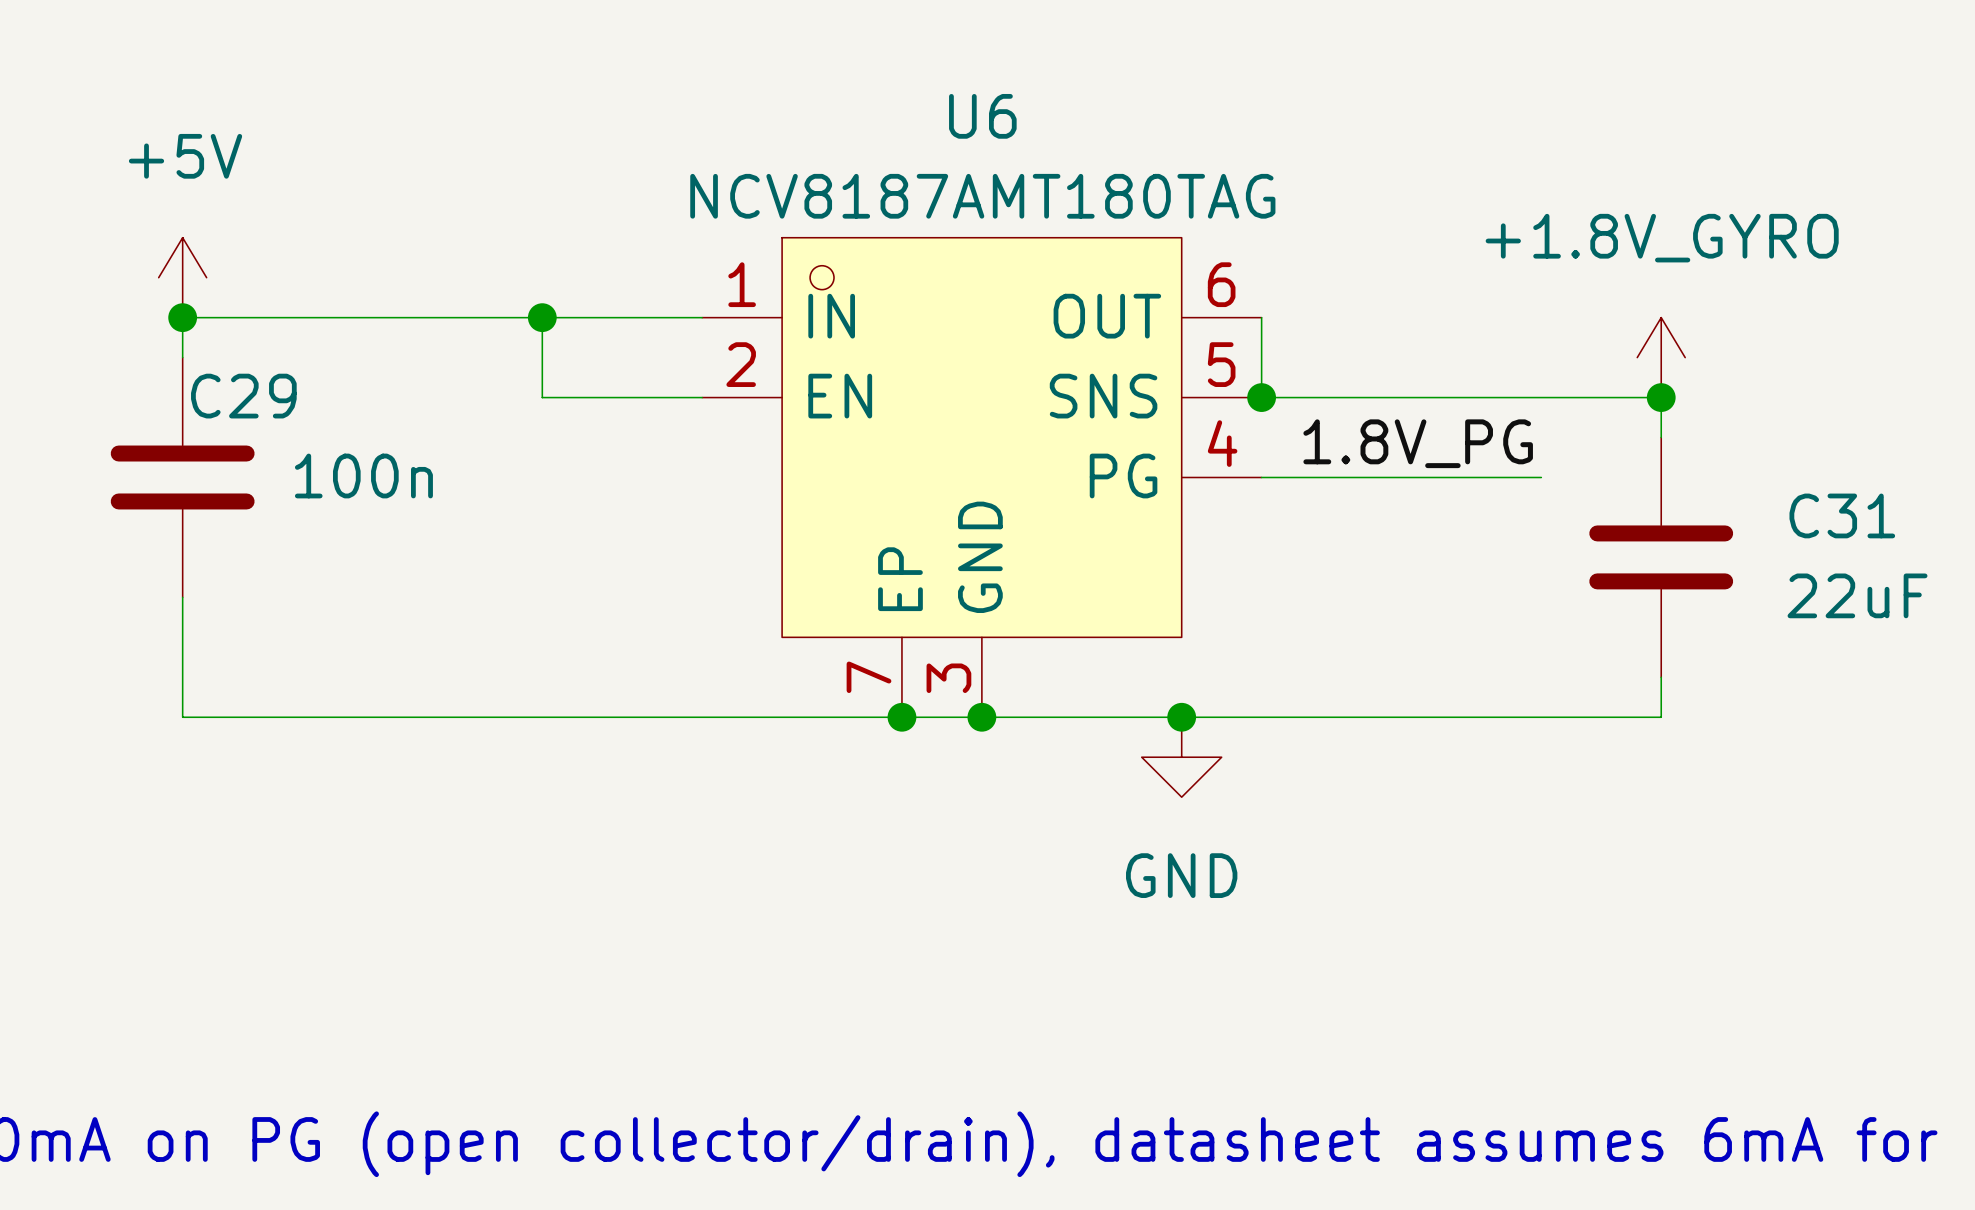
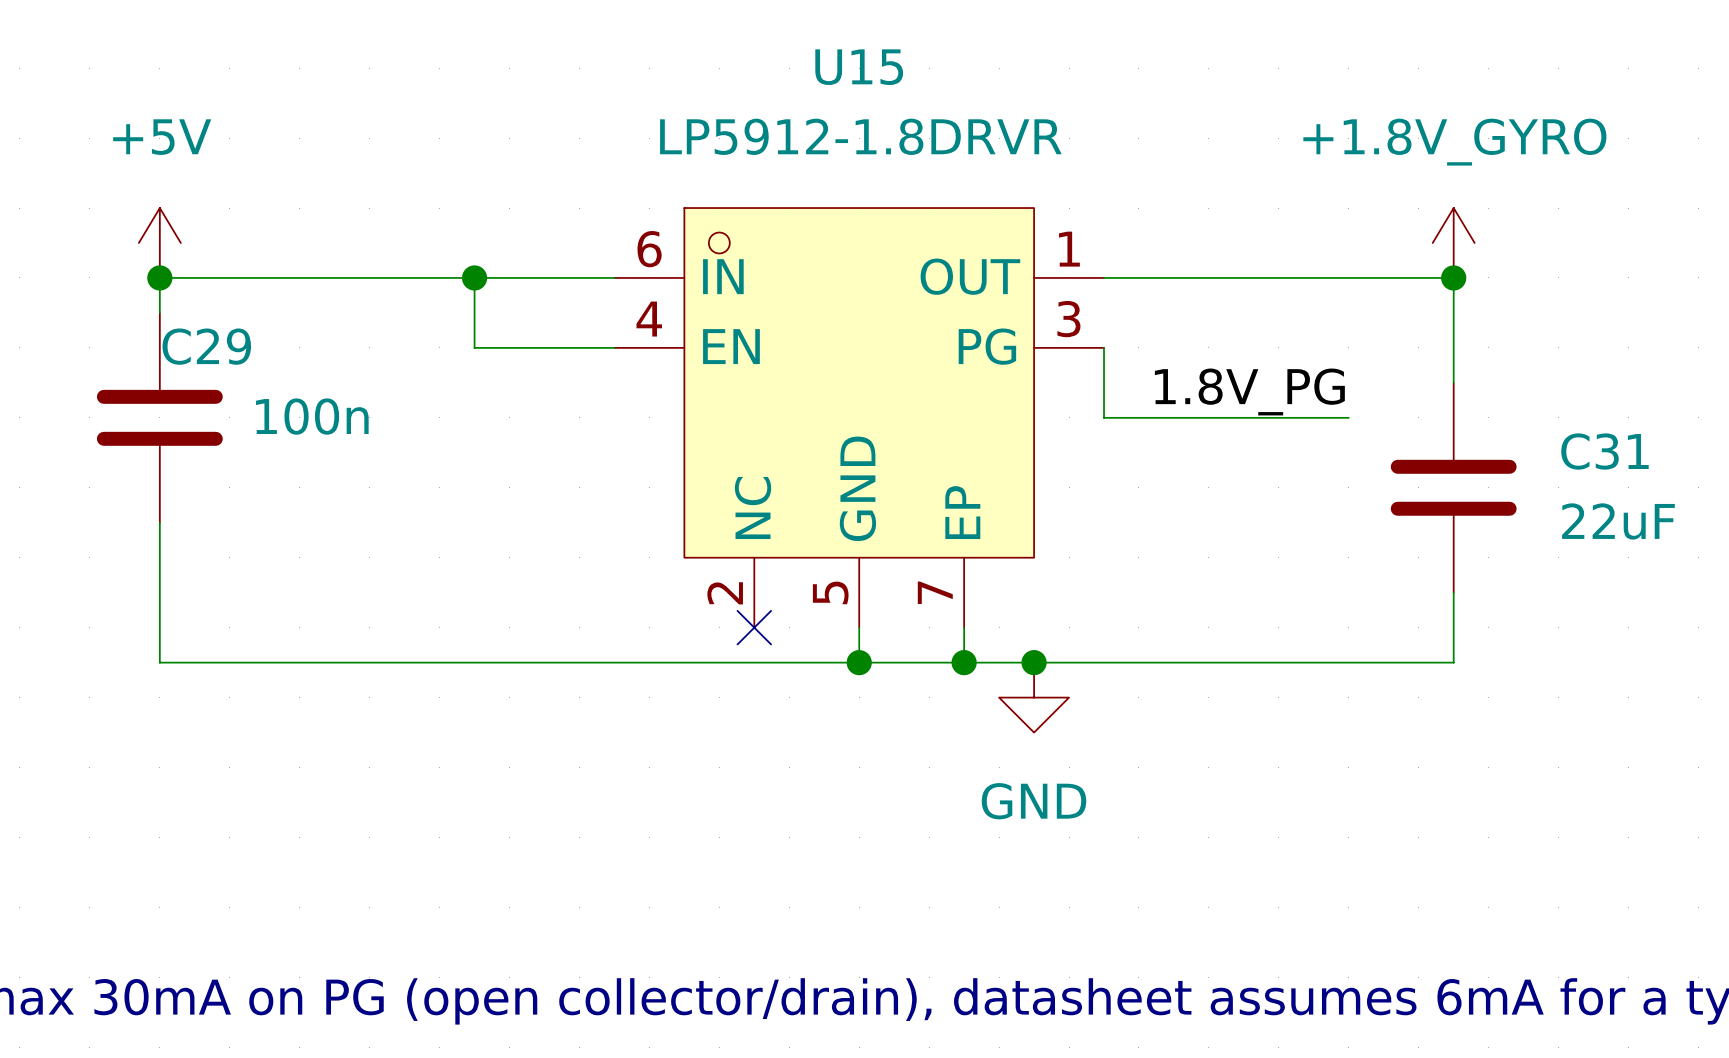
wire: (1261, 317) (1261, 397) (1661, 397) -> (1104, 277) (1453, 277) (1453, 347)
power symbol position: +1.8V_GYRO (1661, 357) -> +1.8V_GYRO (1453, 242)
wire: none -> (1104, 347) (1104, 417)
junction: (1261, 397) -> none
junction position: (1661, 397) -> (1453, 277)
U6: NCV8187AMT180TAG (981, 477) -> none
U15: none -> LP5912-1.8DRVR (859, 417)
wire: (182, 717) (1661, 717) -> (159, 627) (159, 662) (1453, 662) (1453, 627)
no-connect mark: none -> (754, 627)
junction: (901, 717) -> none
wire: none -> (859, 627) (859, 662)
junction position: (981, 717) -> (859, 662)
wire: none -> (964, 627) (964, 662)
junction position: (1181, 717) -> (1034, 662)
junction: none -> (964, 662)
power symbol position: GND (1181, 757) -> GND (1034, 697)

